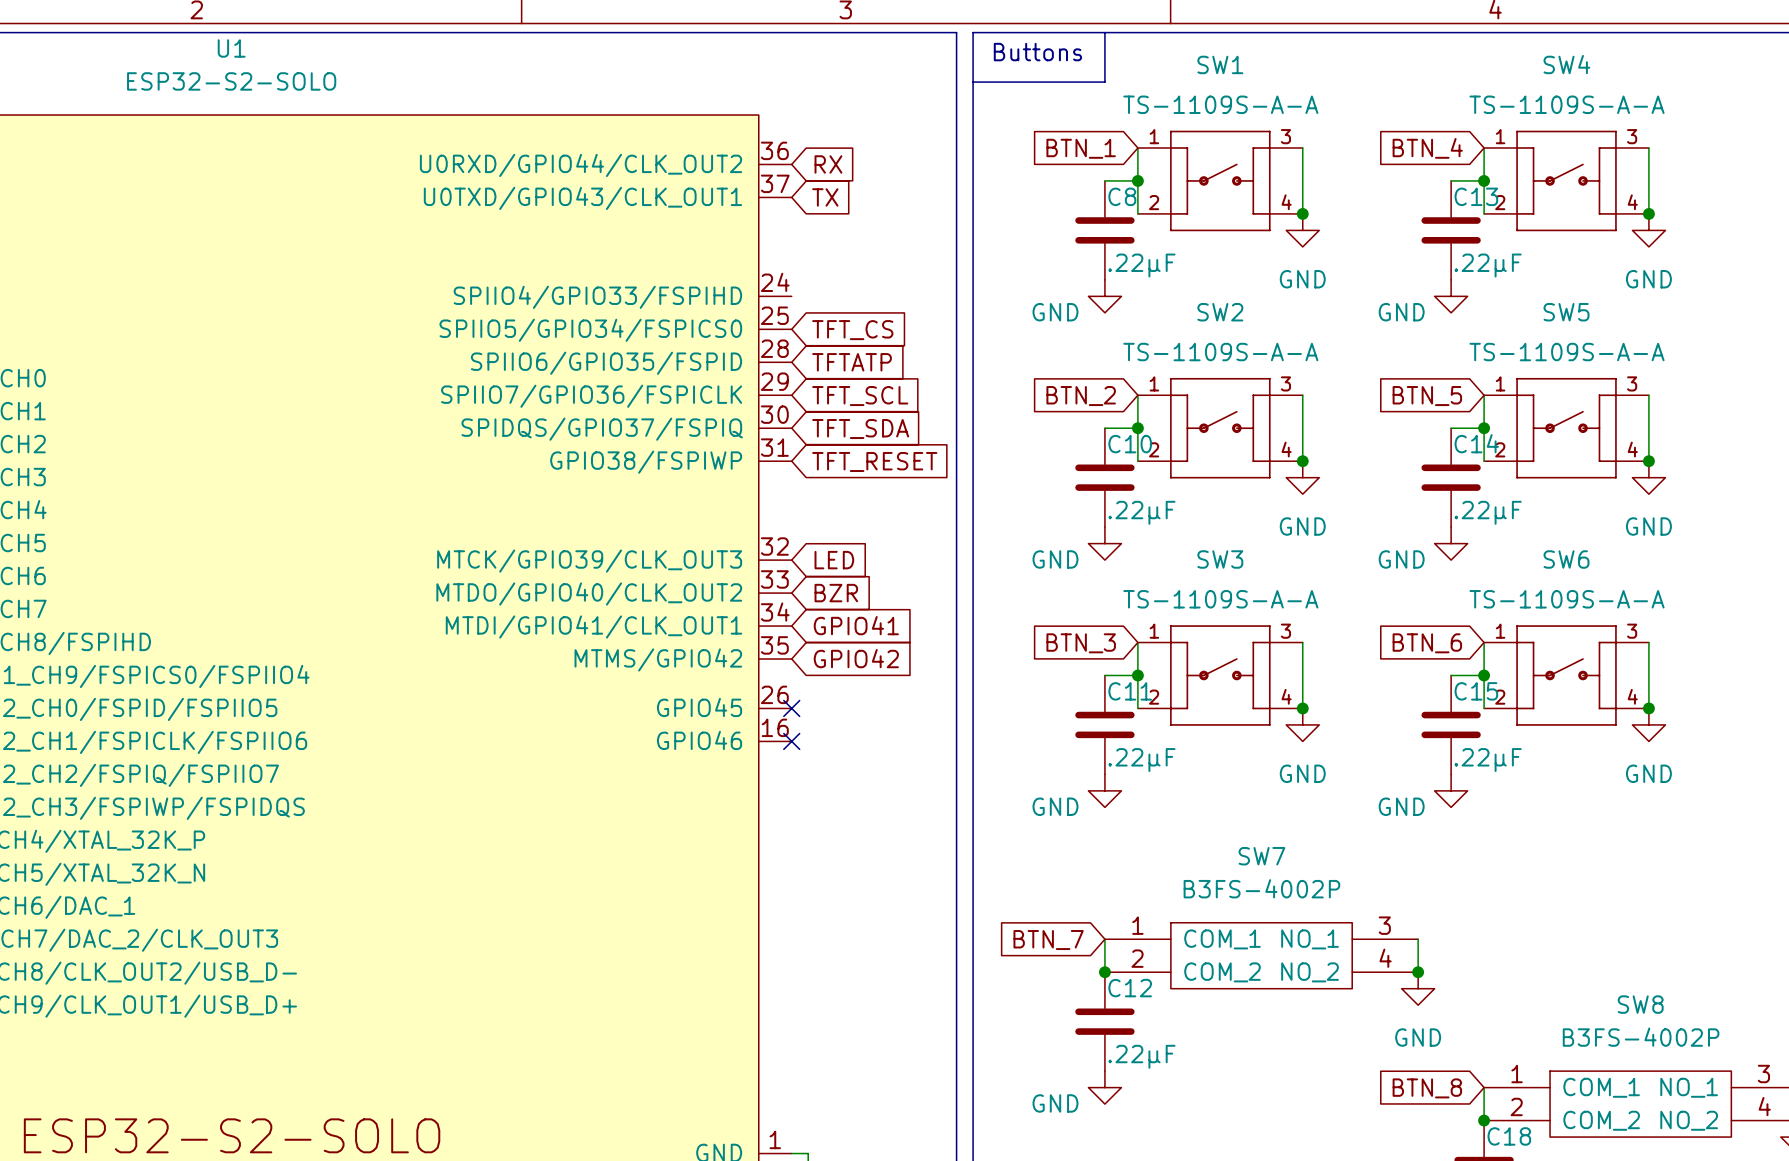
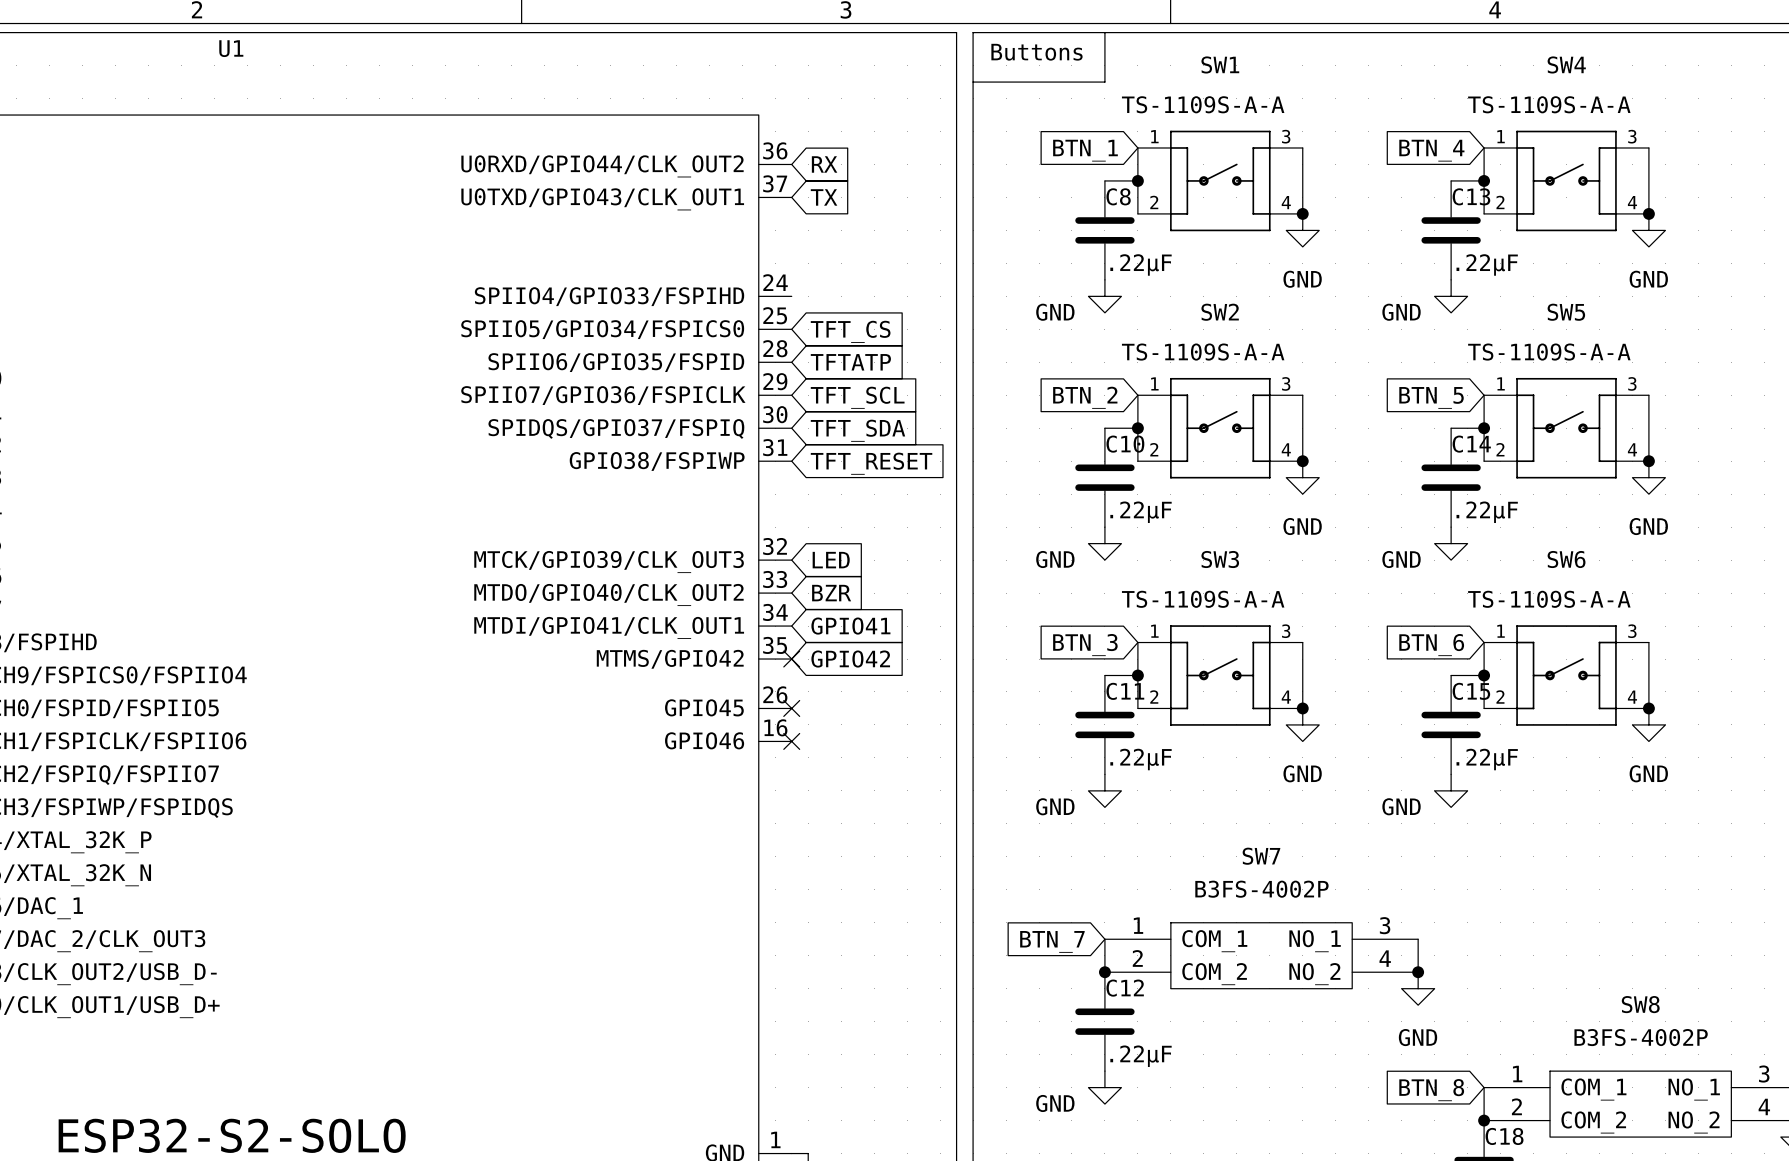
U1 value: ESP32-S2-SOLO (231, 81) -> none
no-connect mark: none -> (791, 659)

